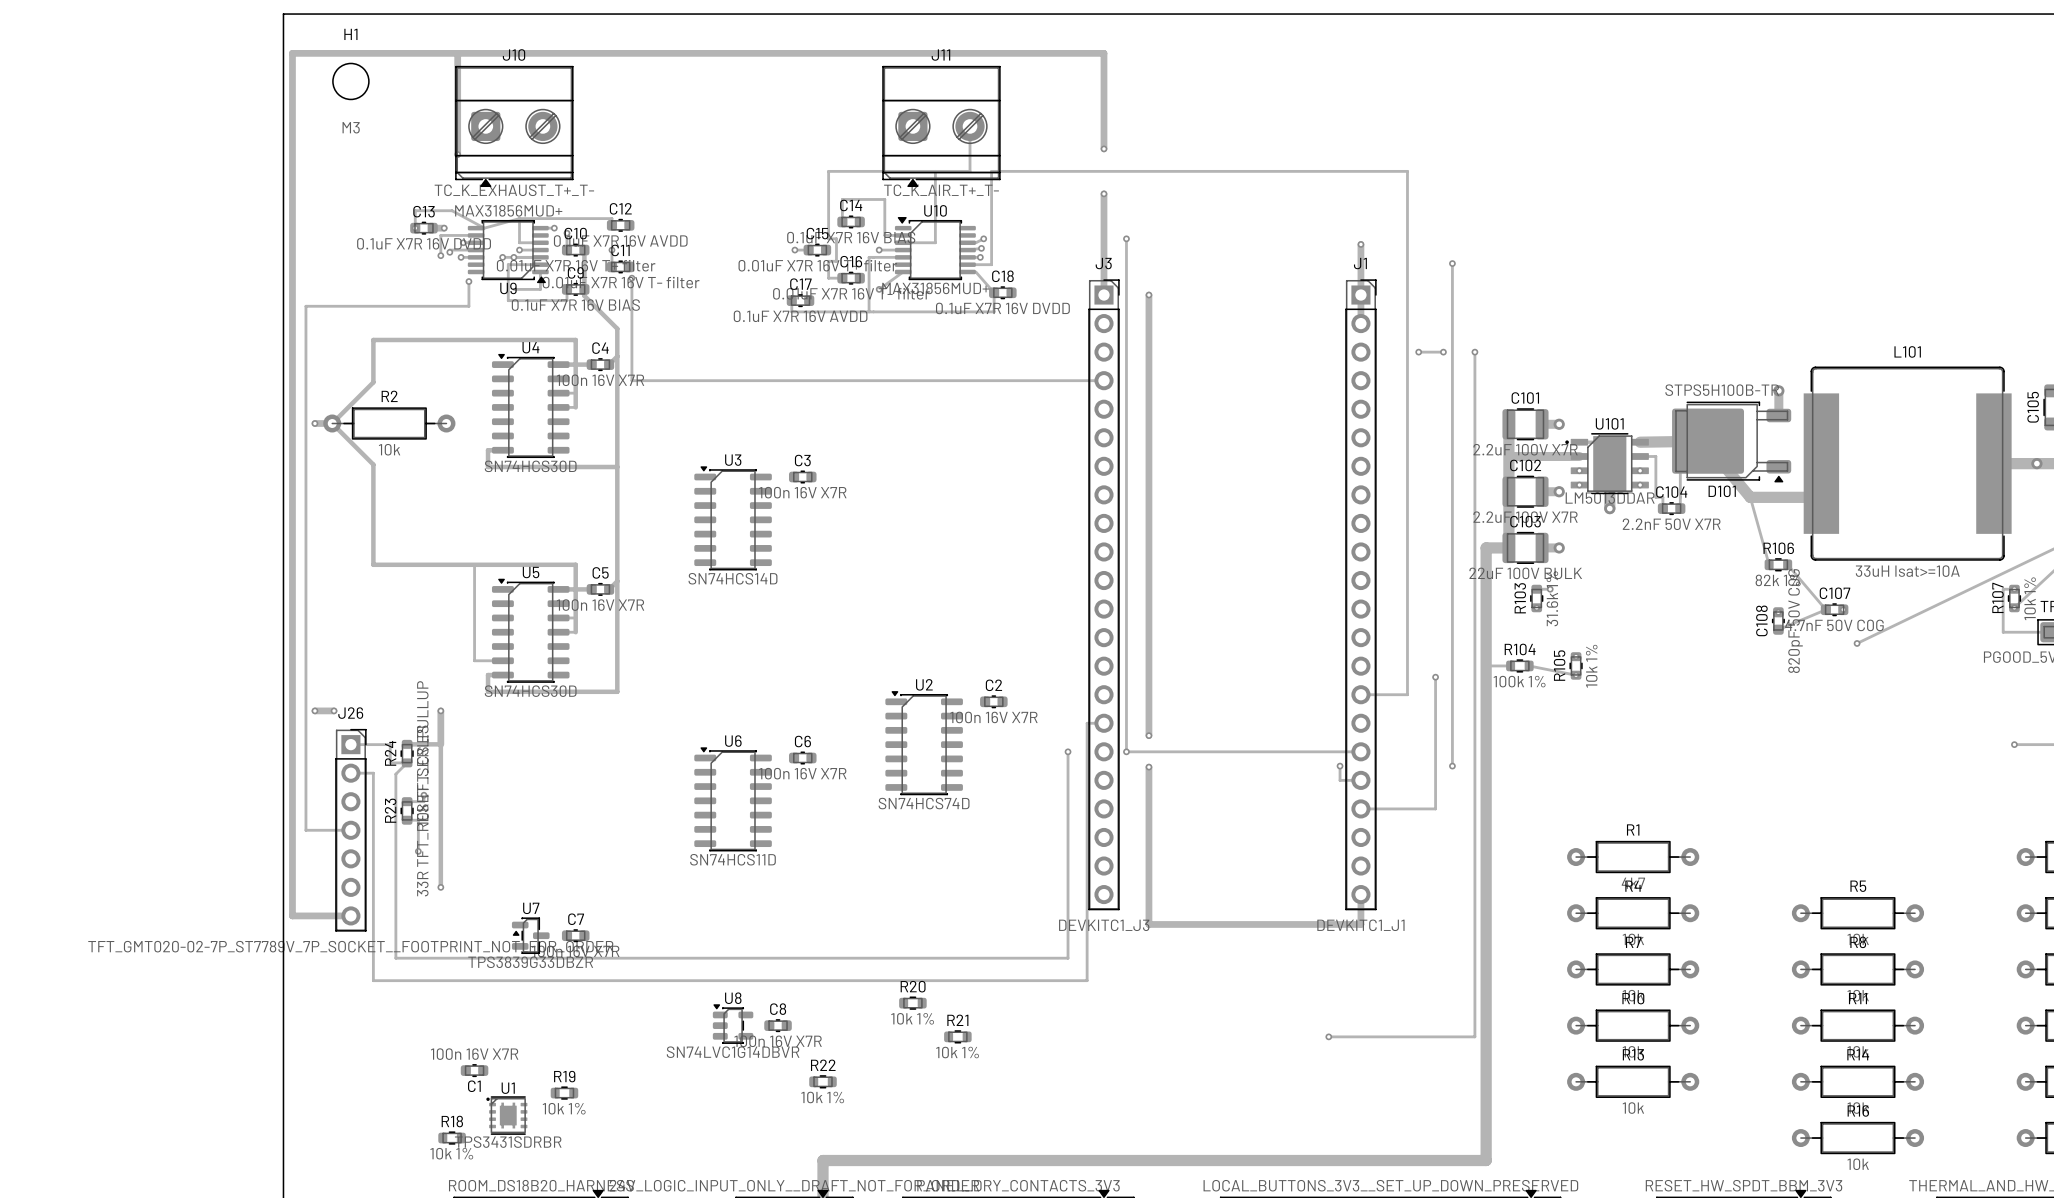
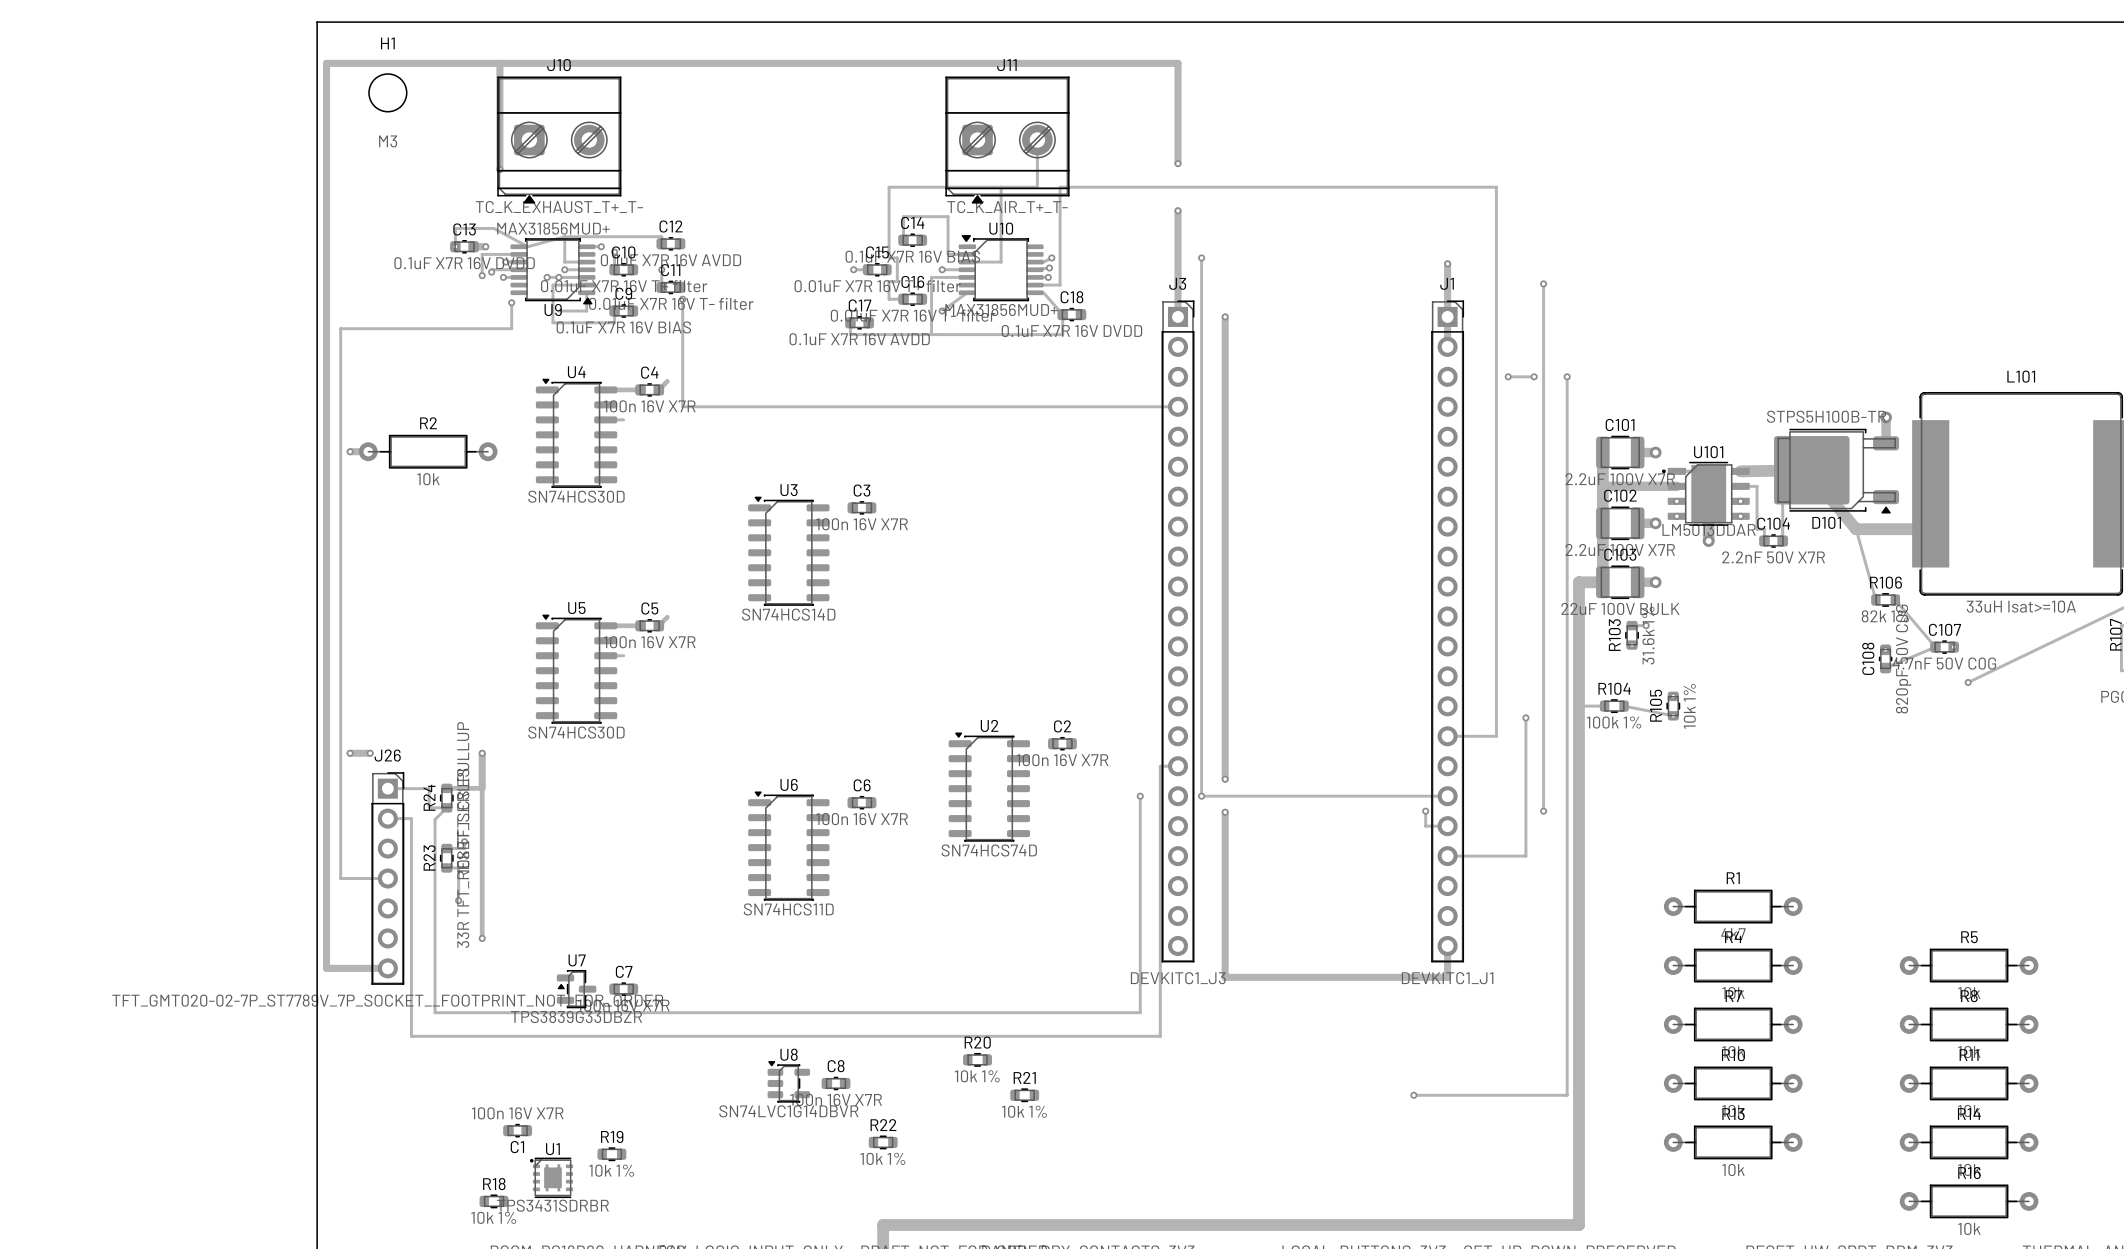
track: (584, 250) (584, 295) (617, 328) (617, 691) (488, 691) (488, 675) (502, 675) -> none
track: (558, 407) (575, 407) (575, 339) (373, 339) (373, 382) (332, 423) (373, 464) (373, 564) (575, 564) (575, 632) (558, 632) -> none
track: (502, 450) (488, 450) (488, 467) (617, 467) -> none
track: (474, 564) (474, 660) (502, 660) -> none

